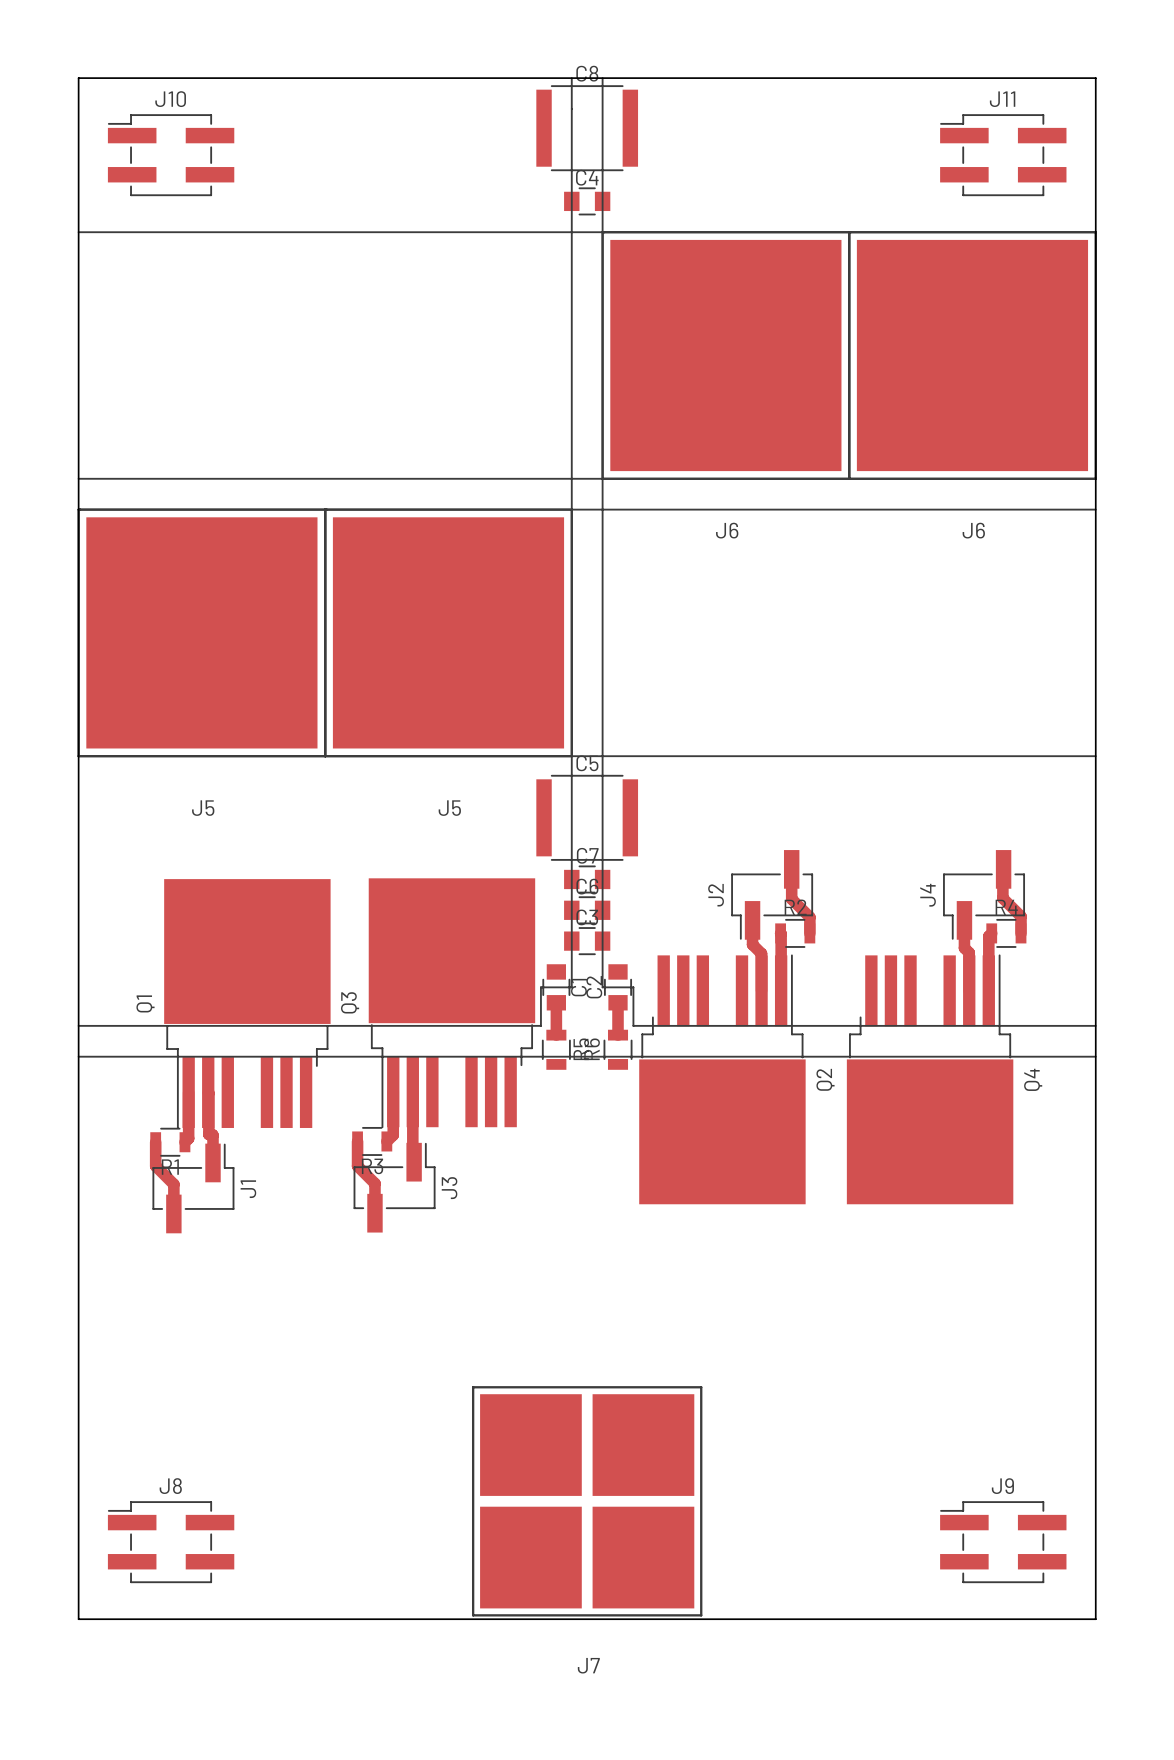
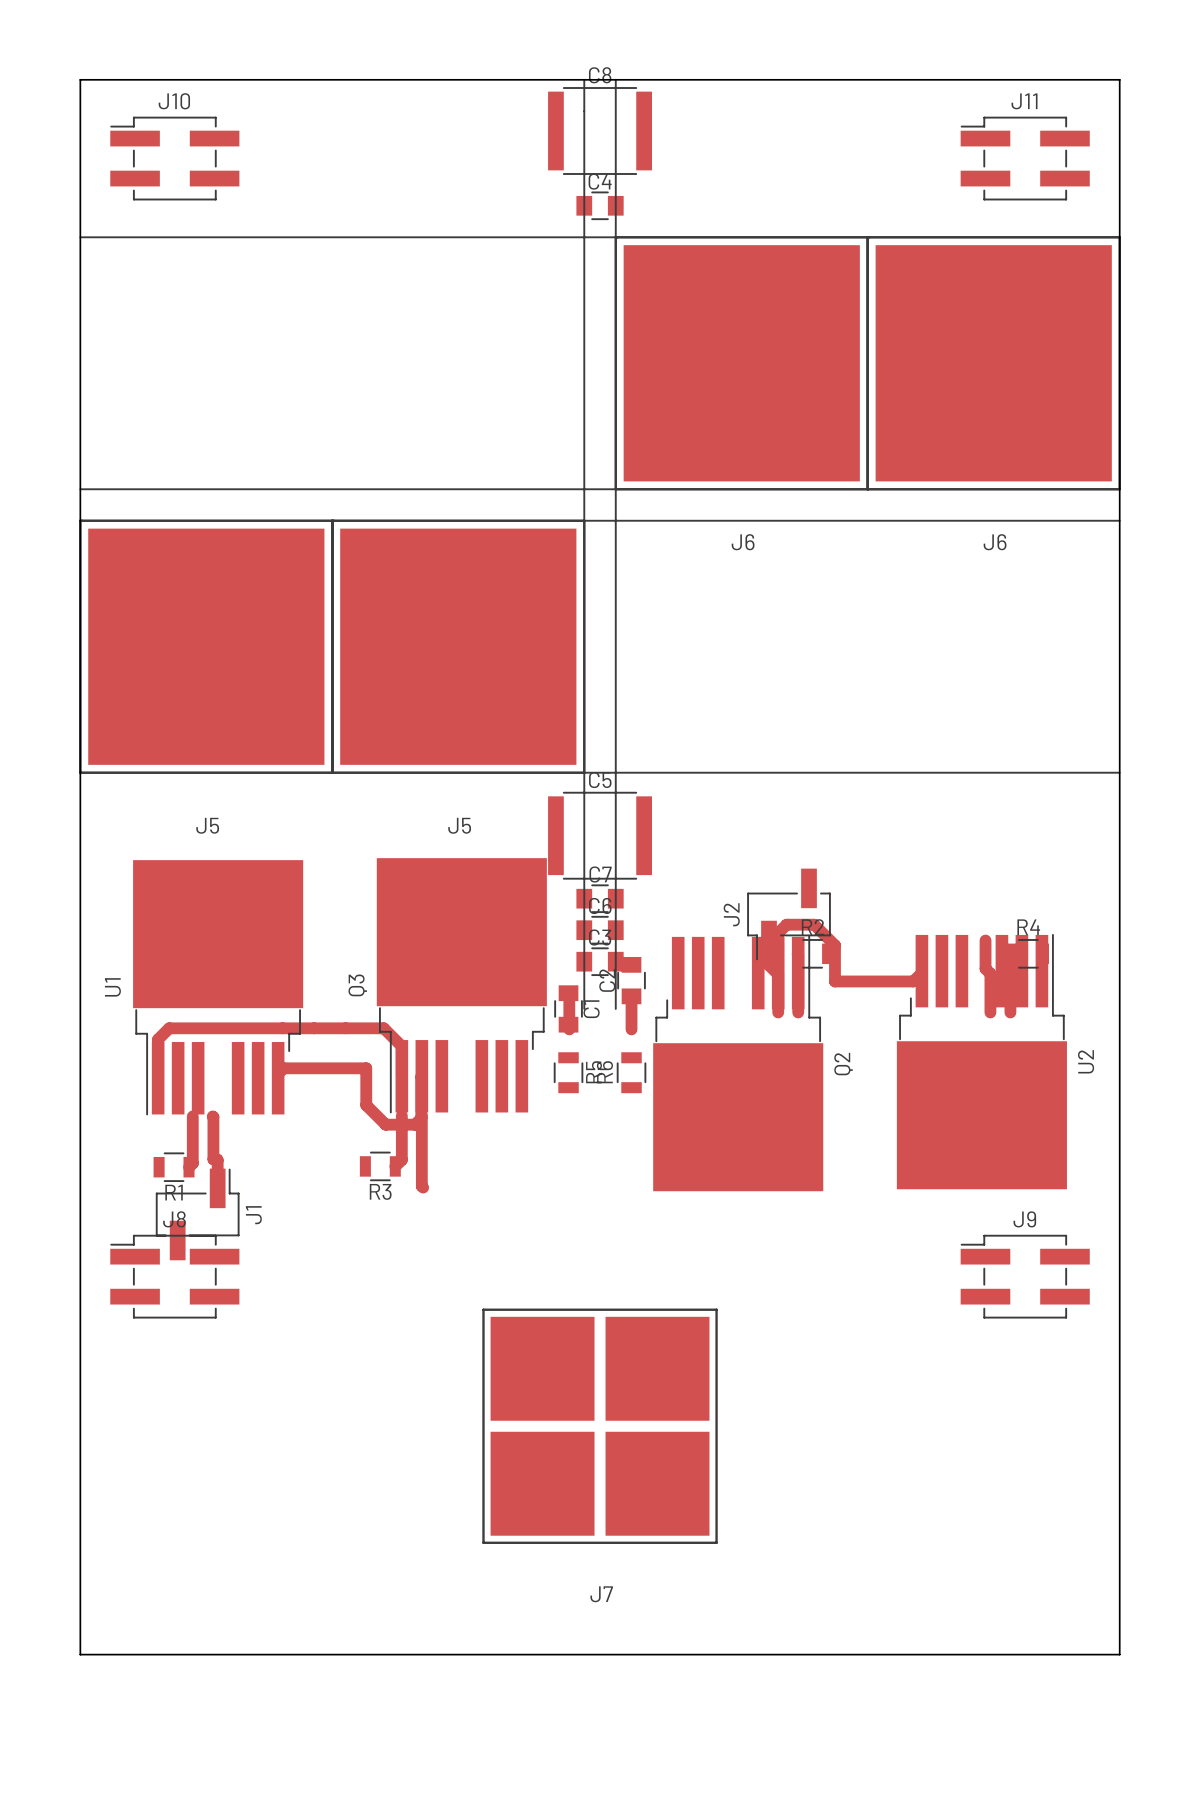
track: (791, 869) (791, 899) (809, 917) (809, 933) -> none
track: (1003, 869) (1002, 898) (1021, 916) (1021, 933) -> none
J4: (984, 894) -> none
track: none -> (921, 971) (913, 981) (834, 981) (834, 945) (814, 924) (786, 924) (777, 933) (778, 973)
U1: none -> (218, 987)
line: (571, 987) (540, 987) (540, 1025) (78, 1025) -> none
line: (602, 987) (633, 987) (633, 1025) (1095, 1025) -> none
C2 position: (618, 987) -> (631, 980)
track: (556, 1002) (556, 1035) -> (569, 996) (569, 1029)
Q3 position: (451, 1003) -> (461, 985)
Q1: (247, 1004) -> none
track: (618, 1007) (618, 1035) -> (631, 996) (631, 1024)
U2: none -> (981, 1061)
track: none -> (401, 1076) (401, 1046) (383, 1028) (169, 1028) (158, 1039) (158, 1078)
track: none -> (421, 1076) (421, 1118) (414, 1124) (385, 1124) (366, 1105) (366, 1068) (283, 1068) (278, 1073) (278, 1078)
line: (78, 1056) (1095, 1056) -> none
Q2 position: (722, 1079) -> (738, 1063)
Q4: (930, 1079) -> none
track: (357, 1141) (357, 1166) (374, 1183) (374, 1213) -> none
track: (155, 1142) (155, 1166) (173, 1184) (173, 1213) -> none
J3: (394, 1187) -> none
J7 position: (587, 1501) -> (600, 1426)
J8 position: (171, 1542) -> (174, 1276)
J9 position: (1003, 1542) -> (1025, 1276)

